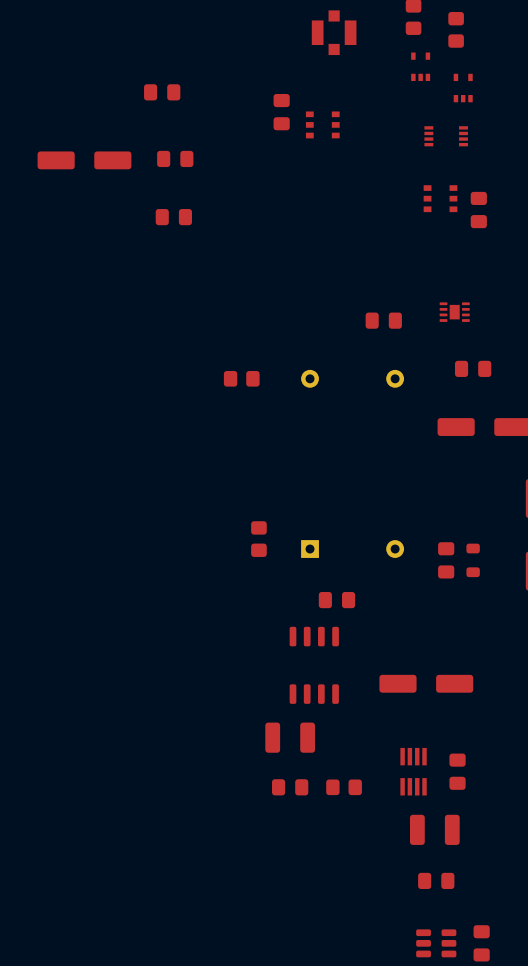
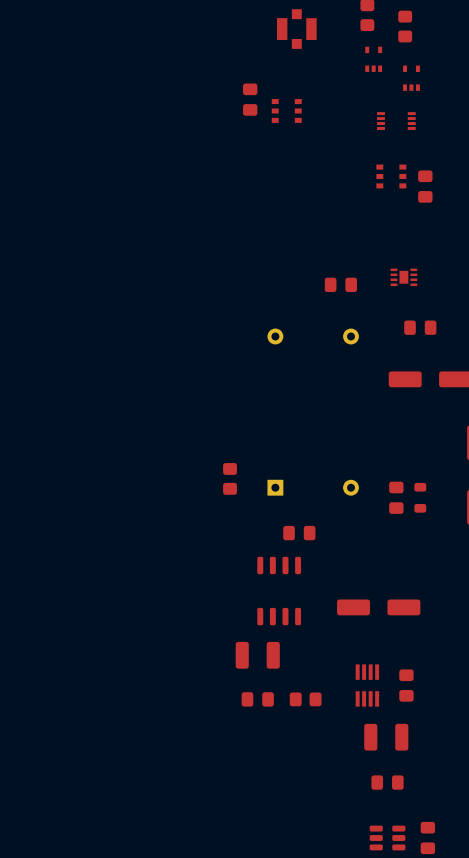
part: (162, 92) -> none
part: (175, 158) -> none
part: (84, 160) -> none
part: (173, 217) -> none
part: (241, 378) -> none

